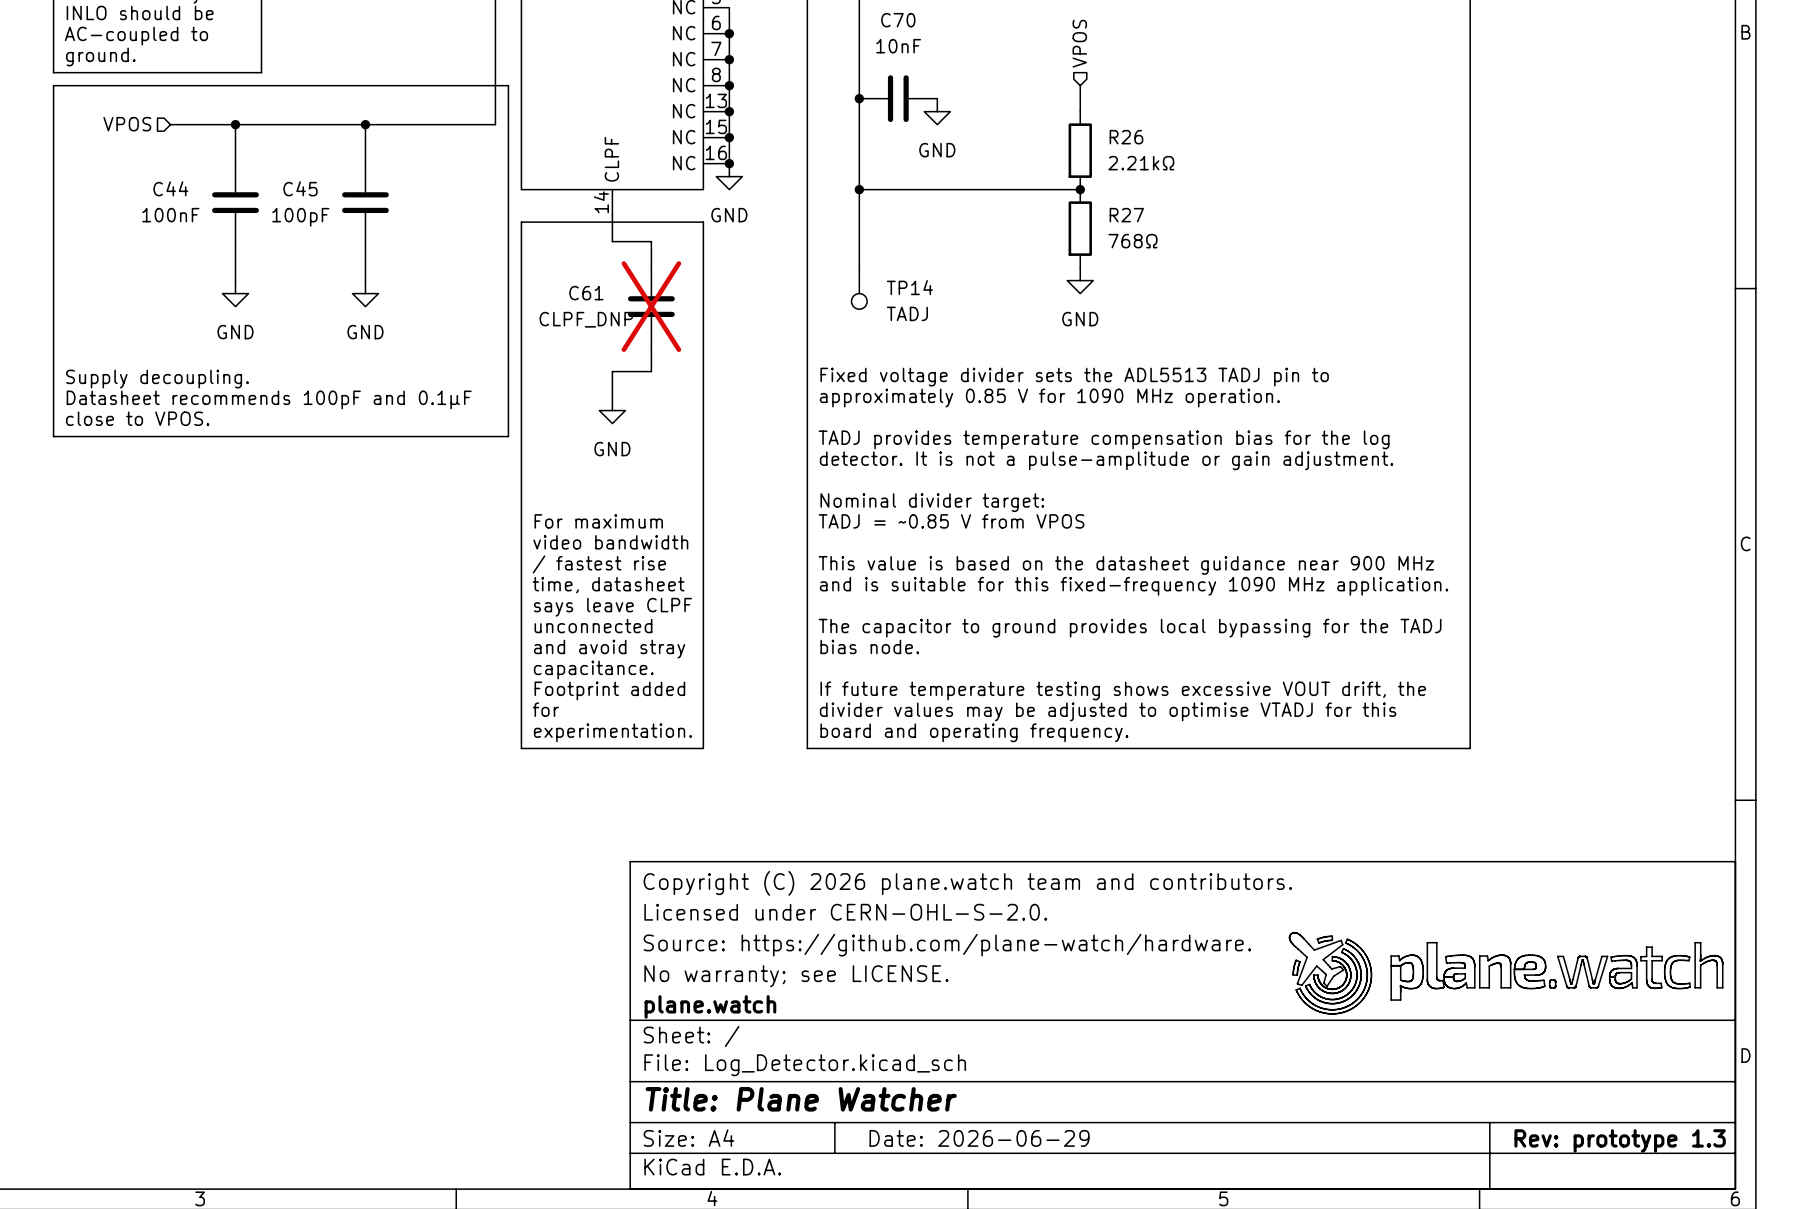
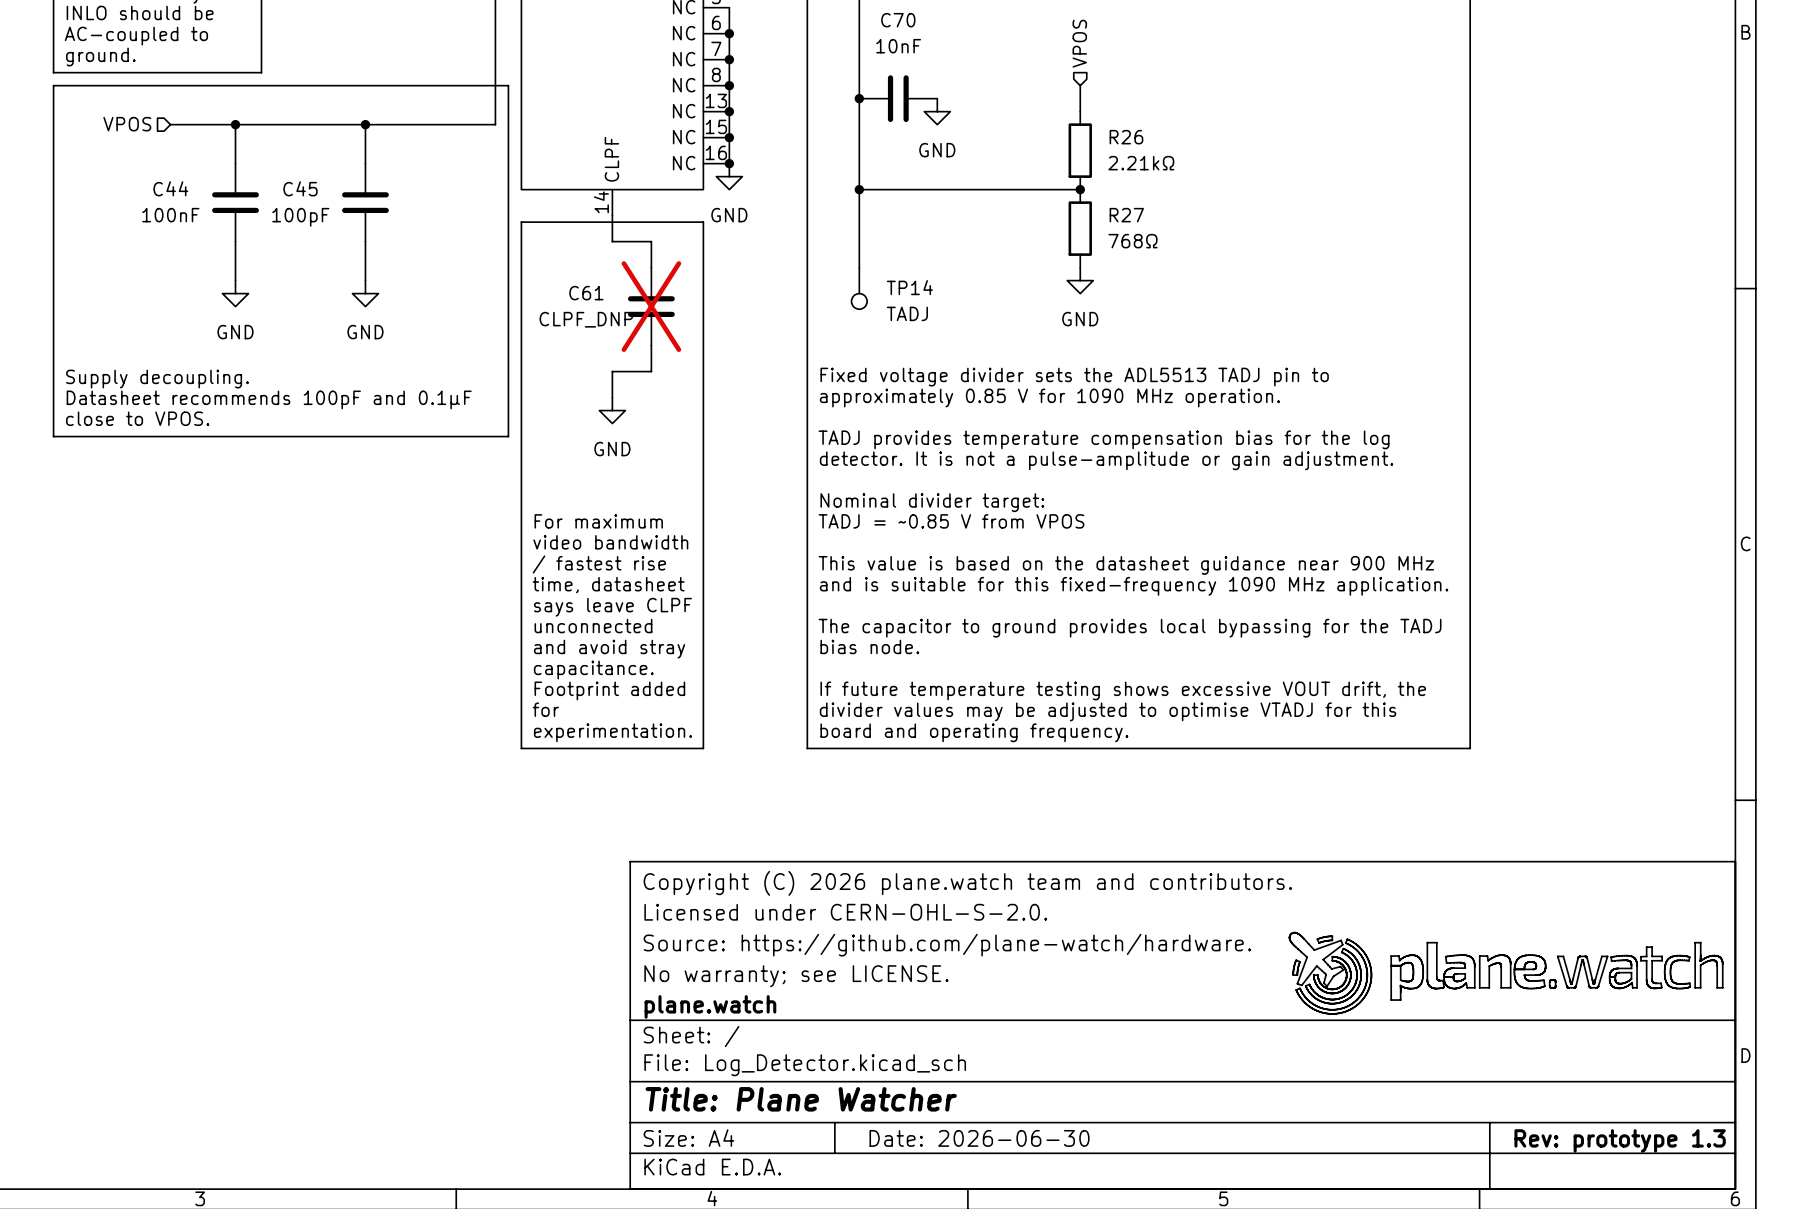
title block: Date: 2026-06-29 (979, 1138) -> Date: 2026-06-30 (979, 1138)

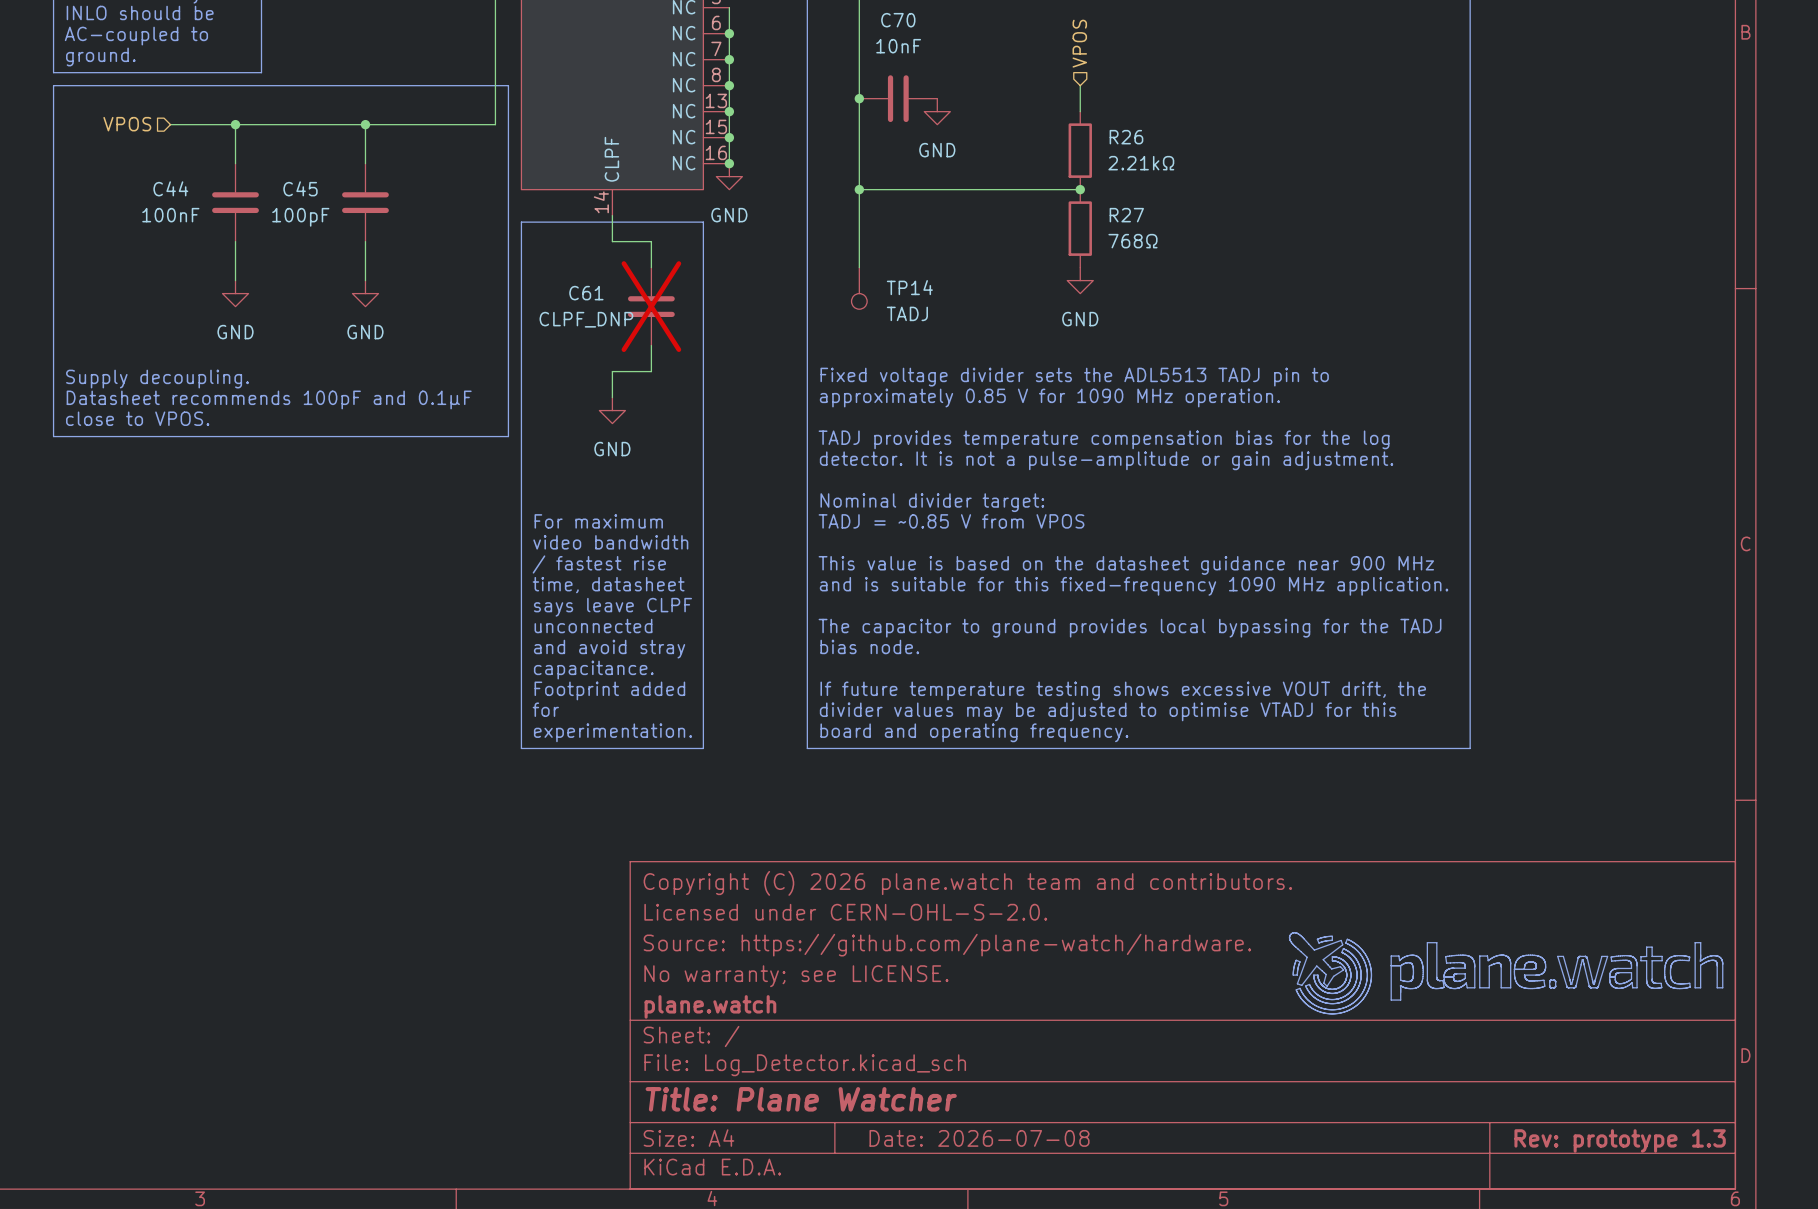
title block: Date: 2026-06-30 (979, 1138) -> Date: 2026-07-08 (979, 1138)

